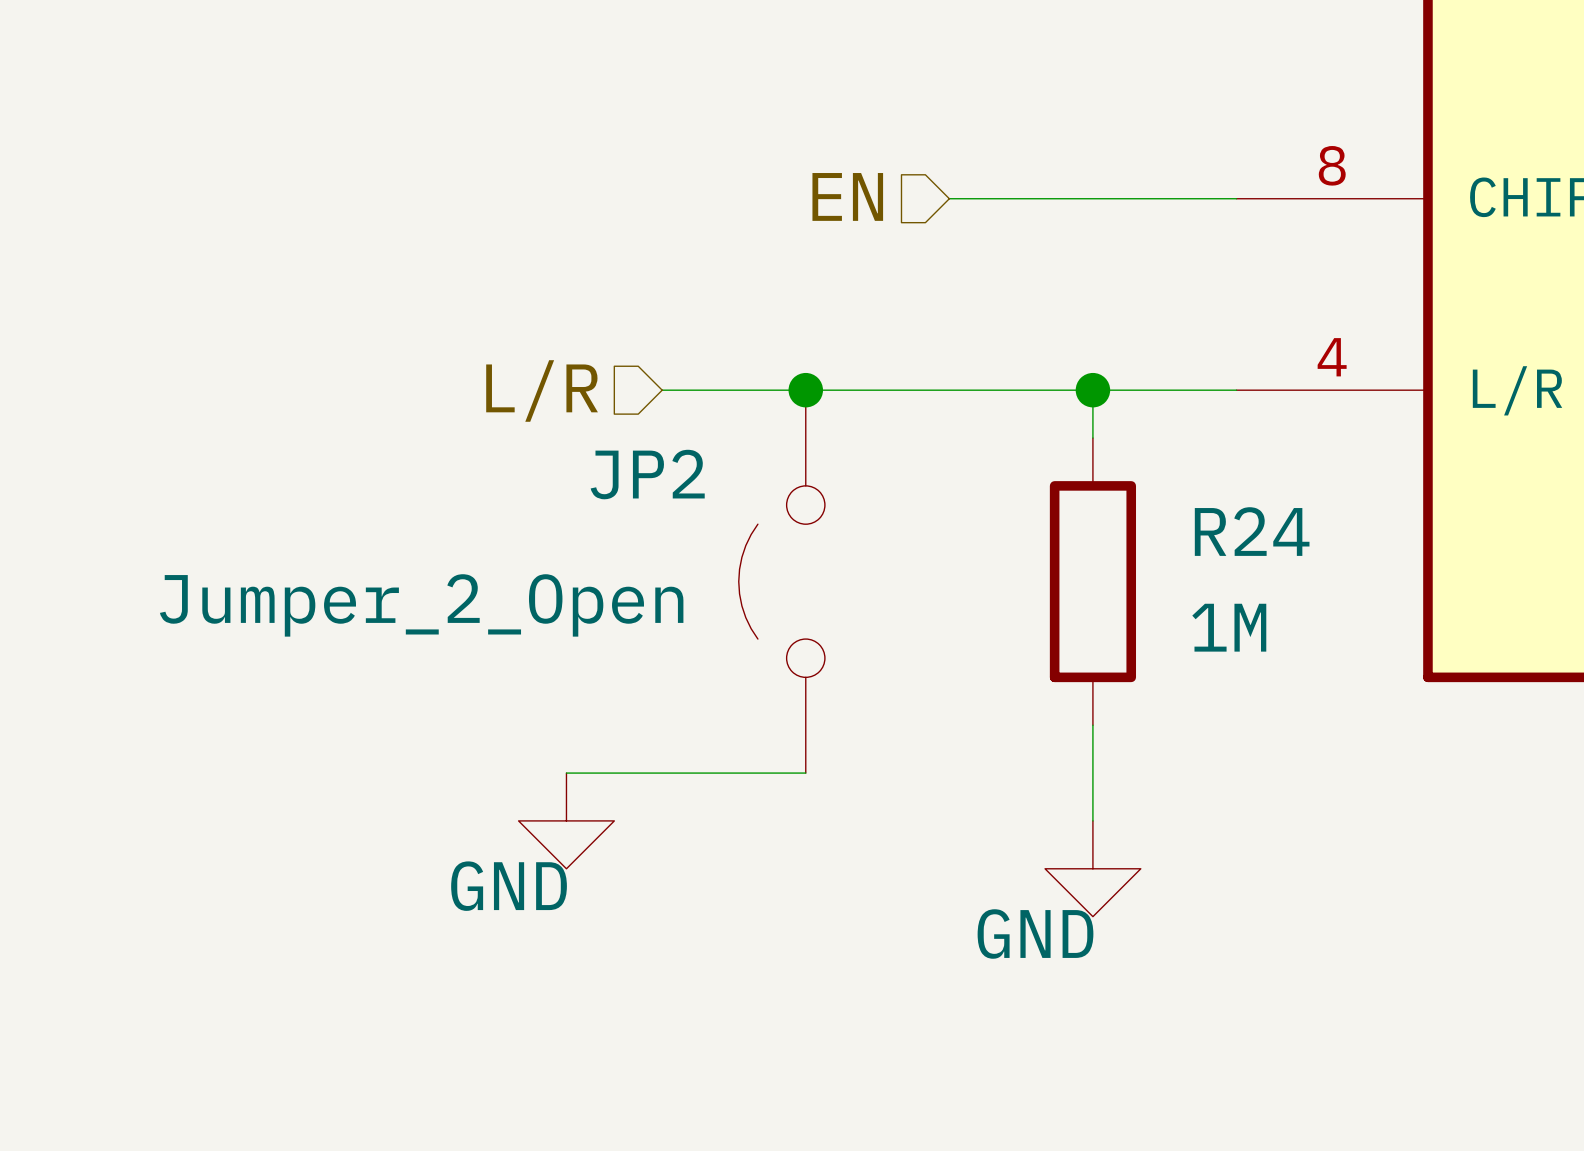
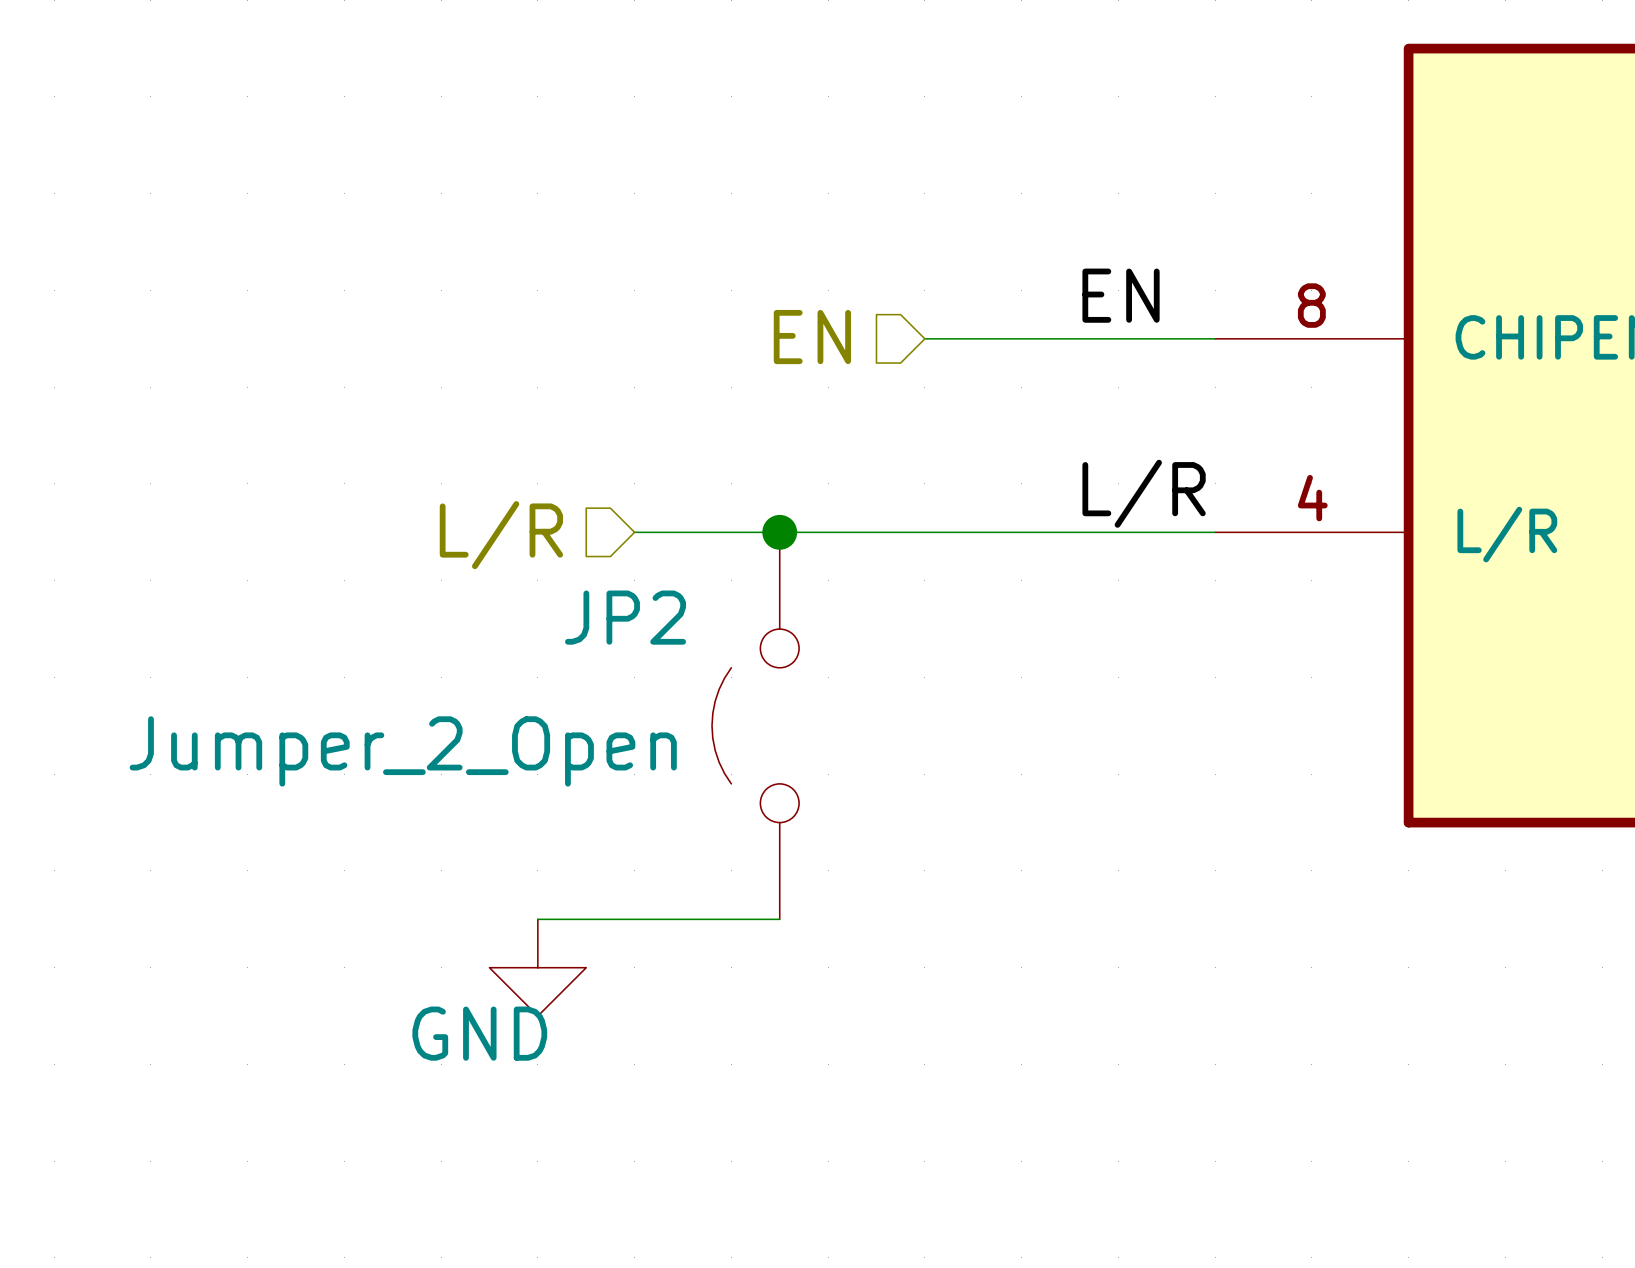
label: none -> EN (1121, 295)
label: none -> L/R (1144, 493)
wire: (1092, 390) (1092, 438) -> none
junction: (1092, 390) -> none
R24: 1M (1092, 581) -> none
wire: (1092, 725) (1092, 820) -> none
power symbol: GND (1092, 868) -> none

